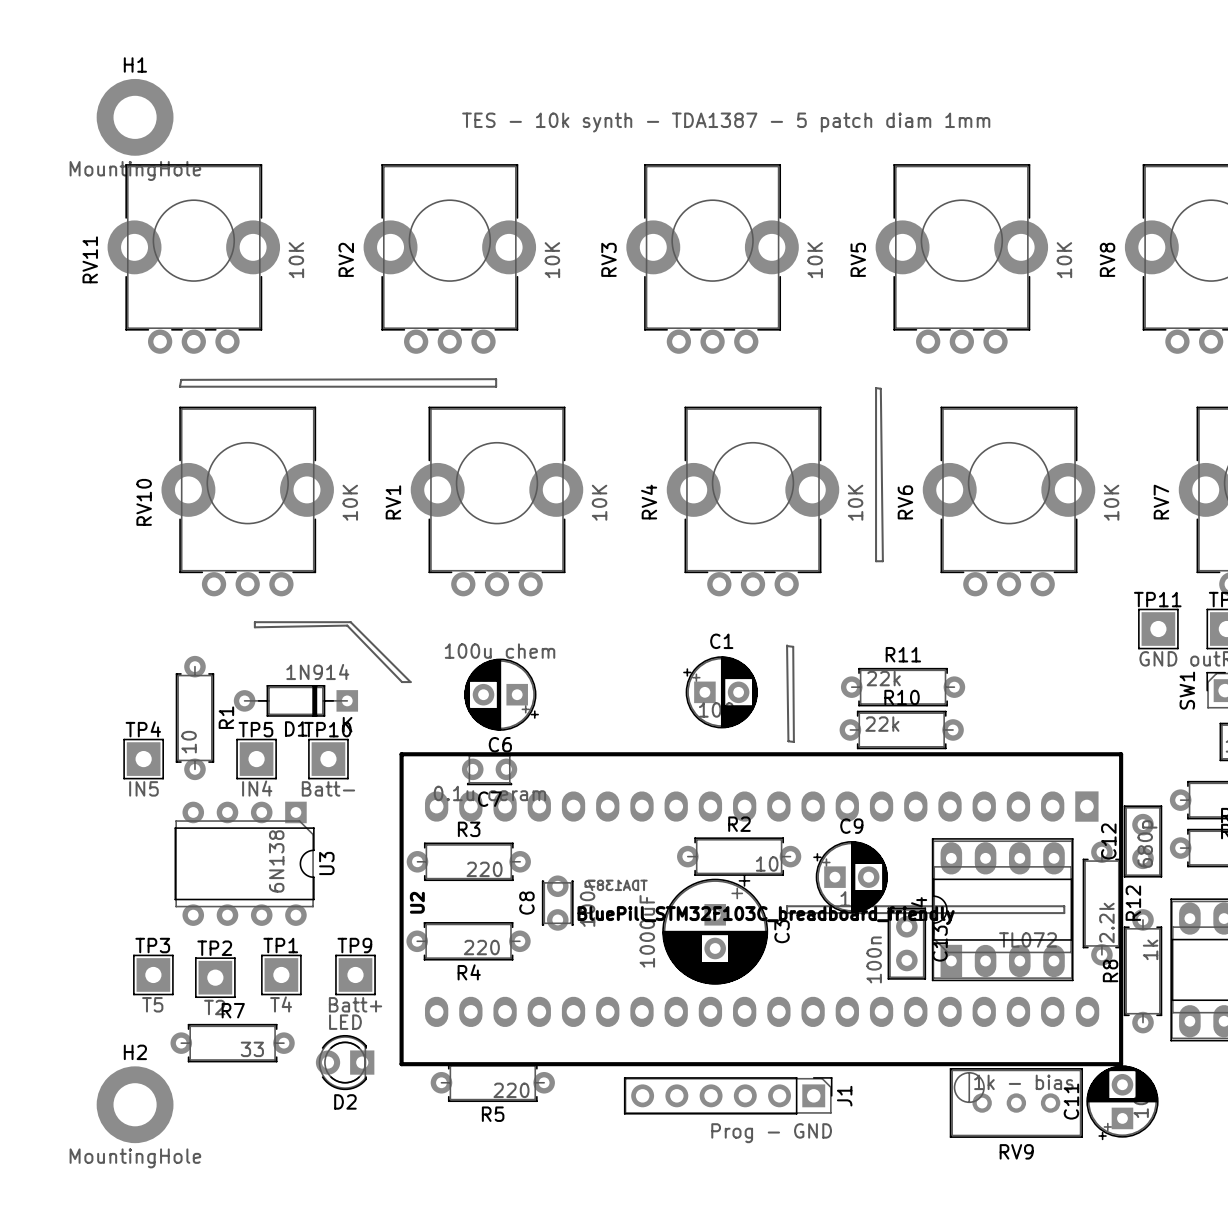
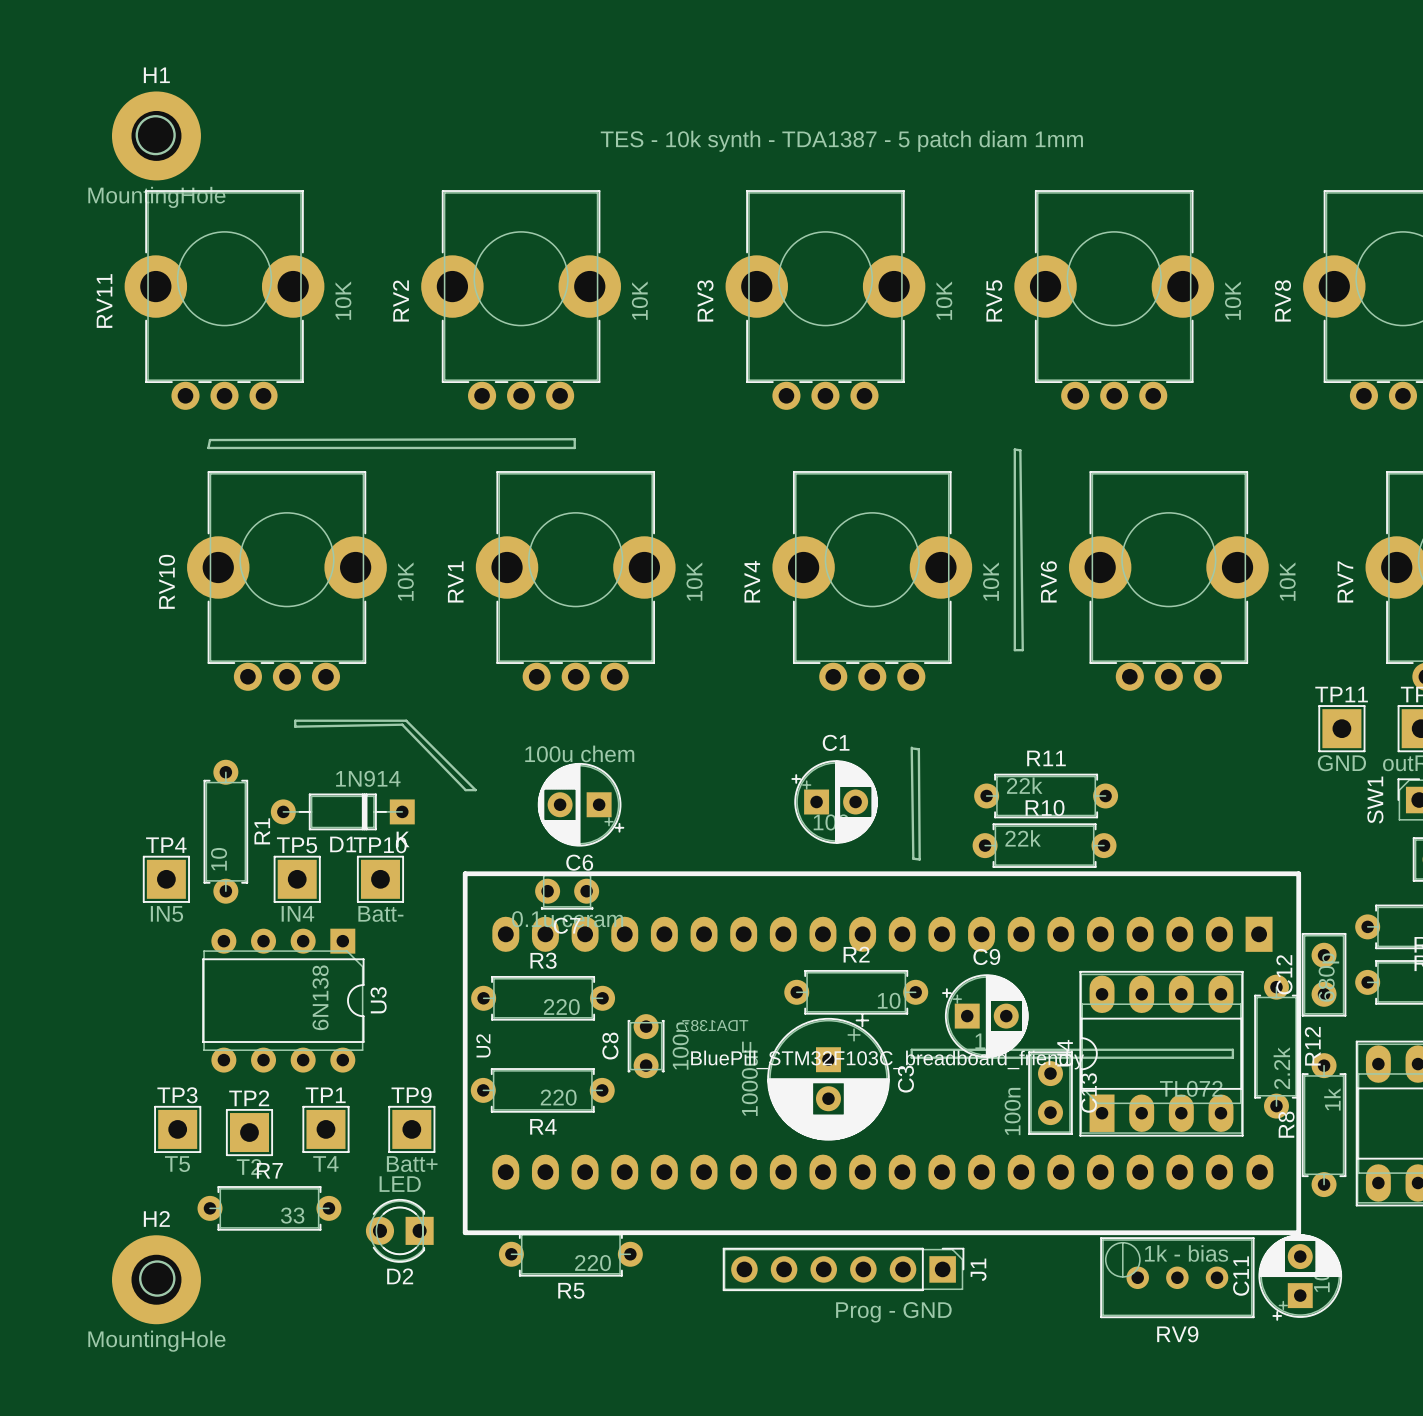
drawing: none -> [135, 115, 176, 156]
drawing: none -> [139, 1260, 176, 1297]

